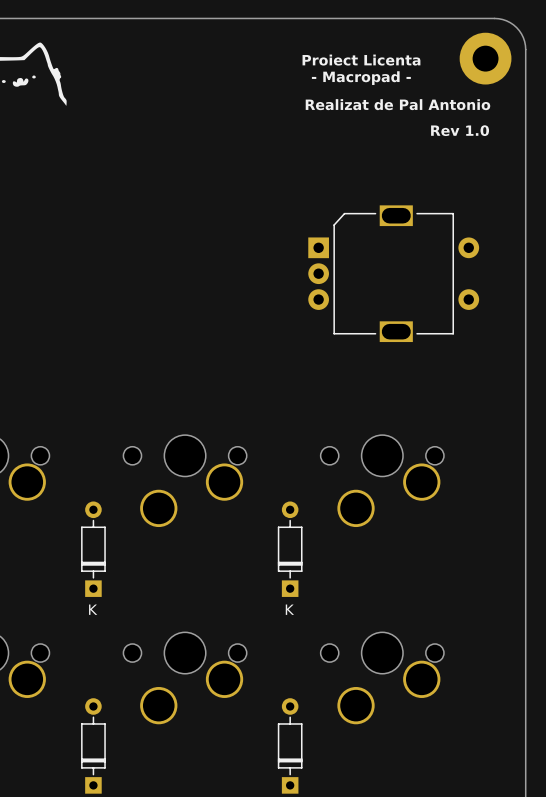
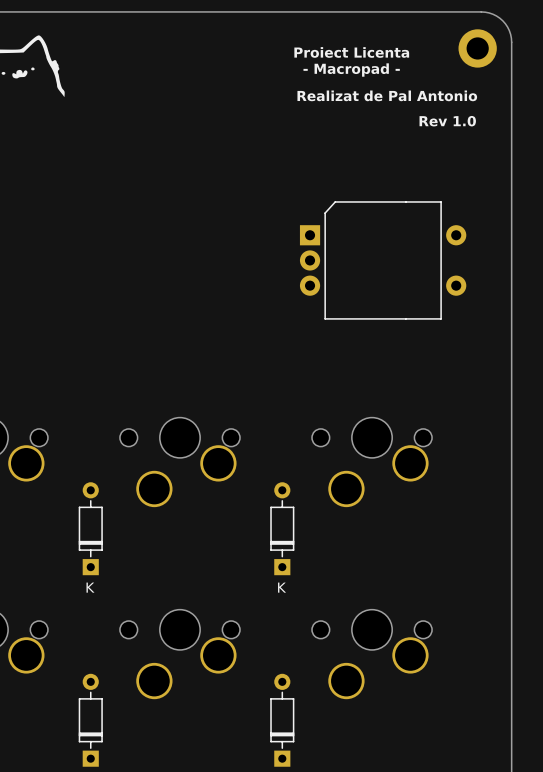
part footprint: [459, 32, 512, 85] -> [458, 29, 497, 68]
part footprint: [308, 205, 480, 343] -> [299, 201, 467, 320]

